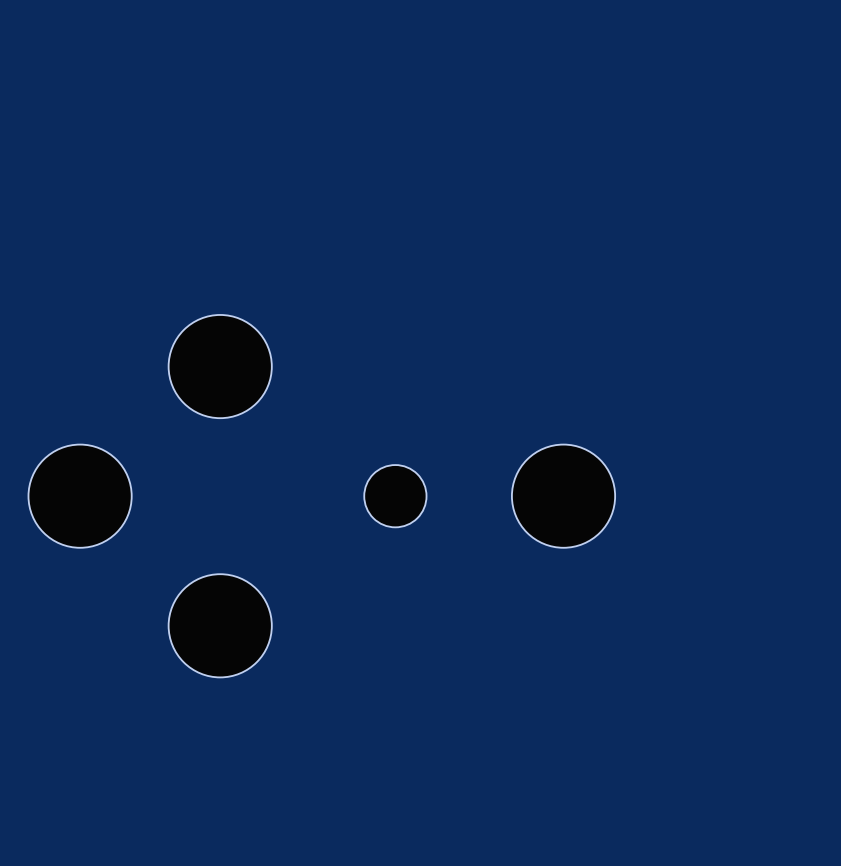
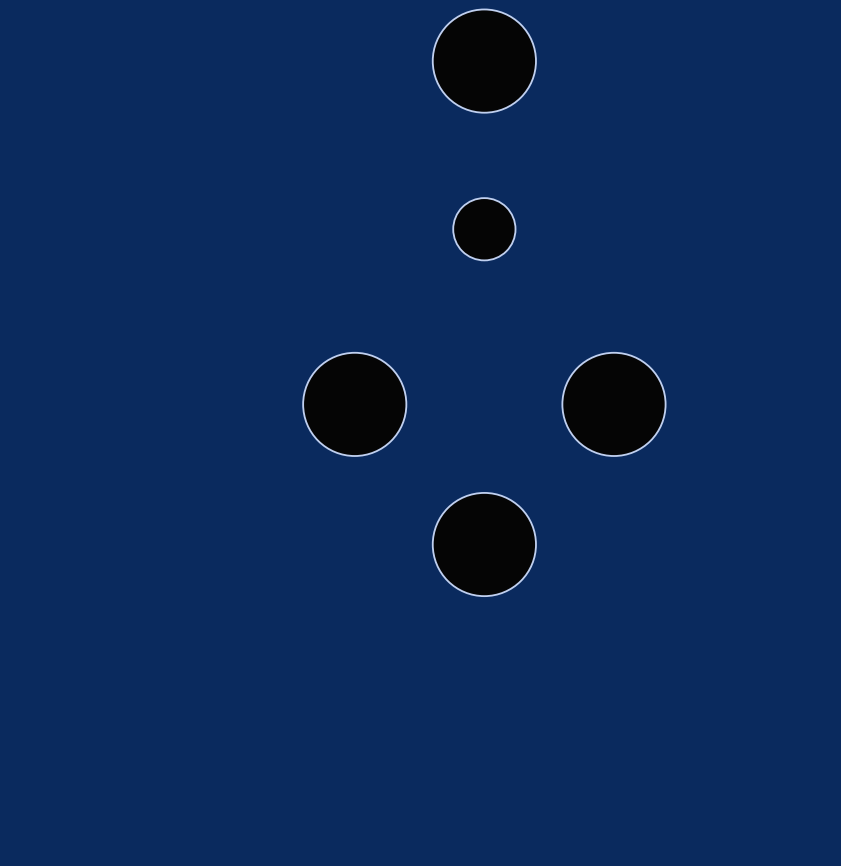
part rotation: 0° (321, 496) -> 90° counterclockwise (484, 302)

